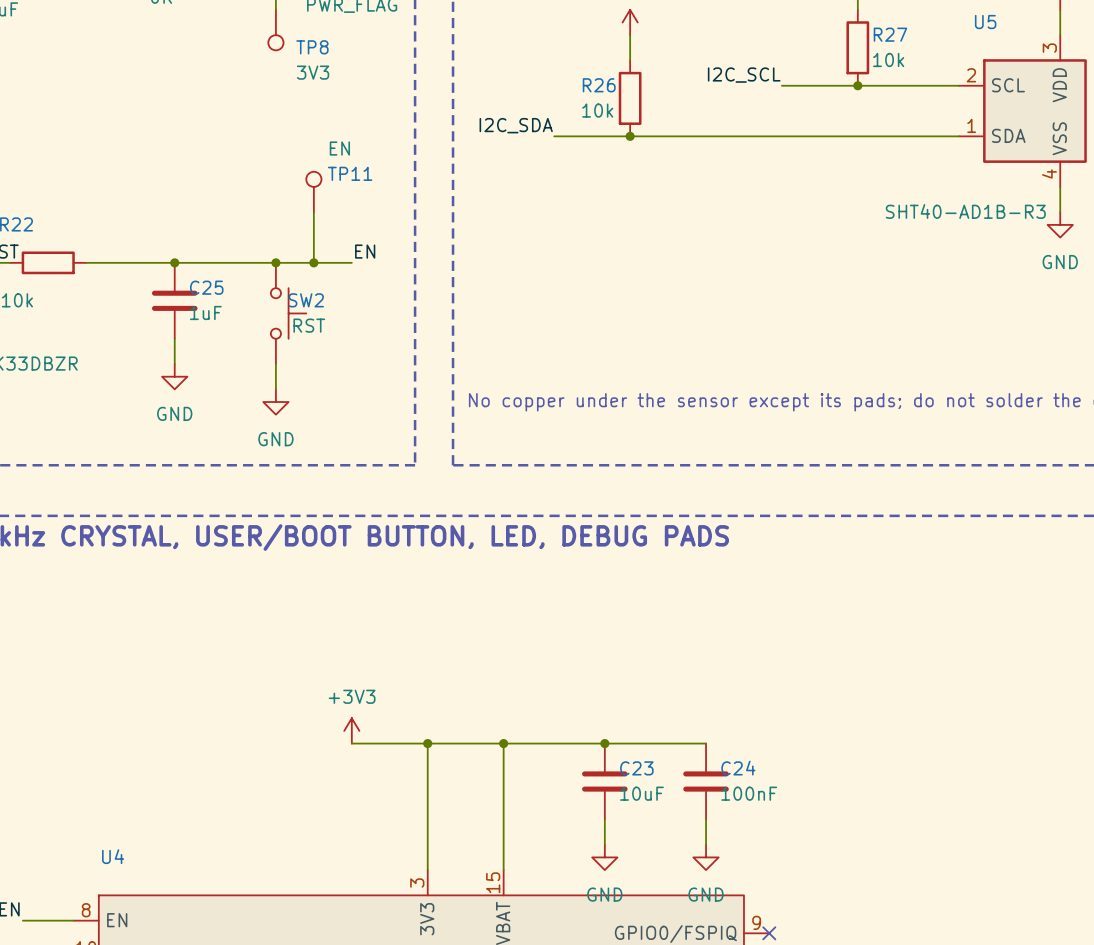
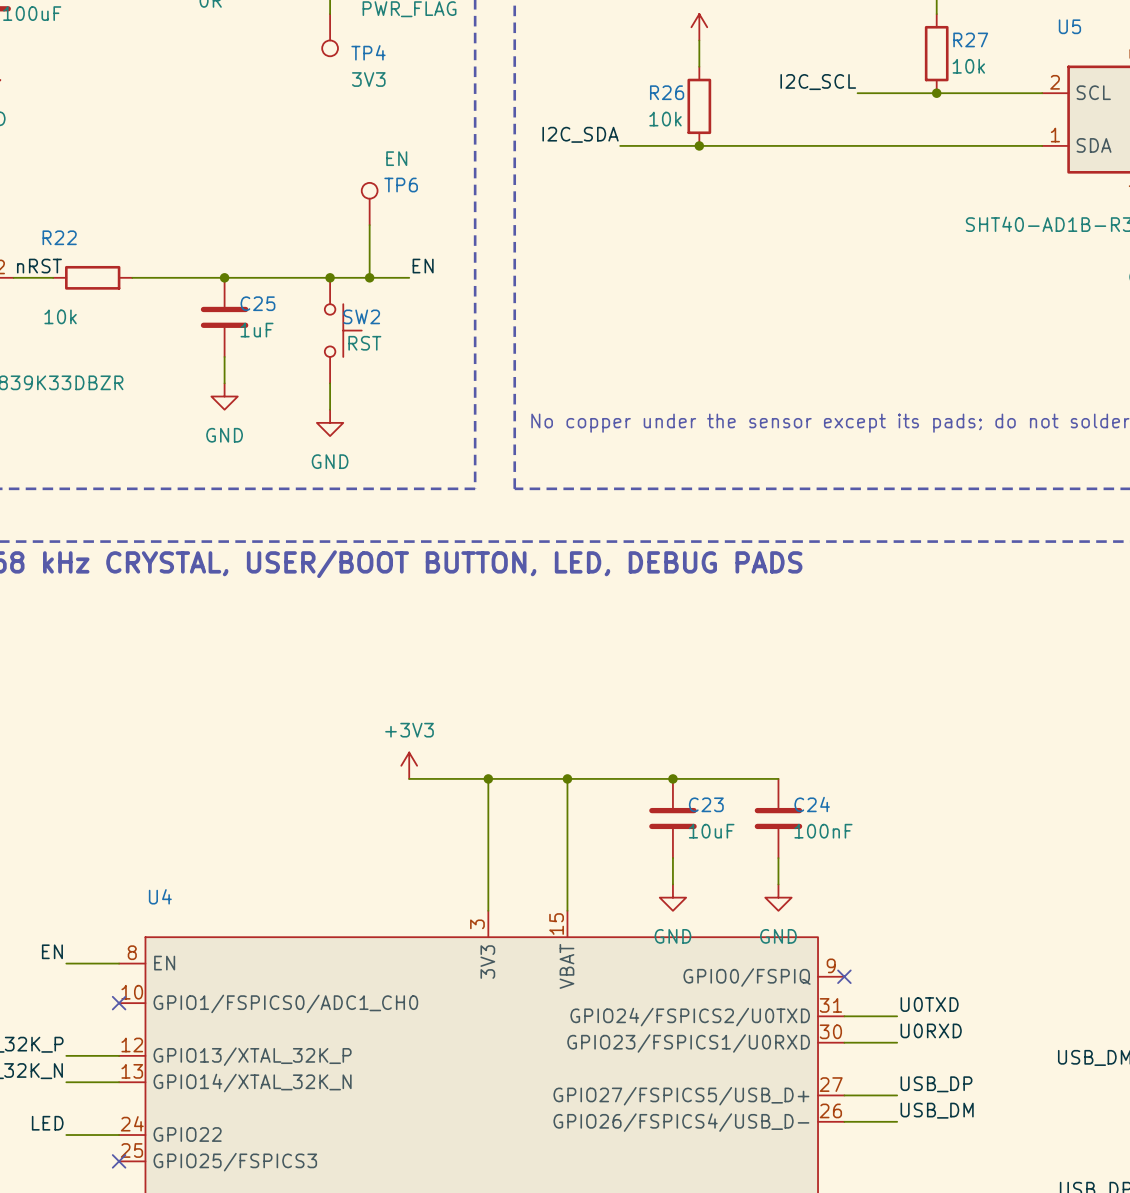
TP8 name: TP8 (312, 47) -> TP4 (368, 52)
TP11 name: TP11 (350, 173) -> TP6 (401, 185)

